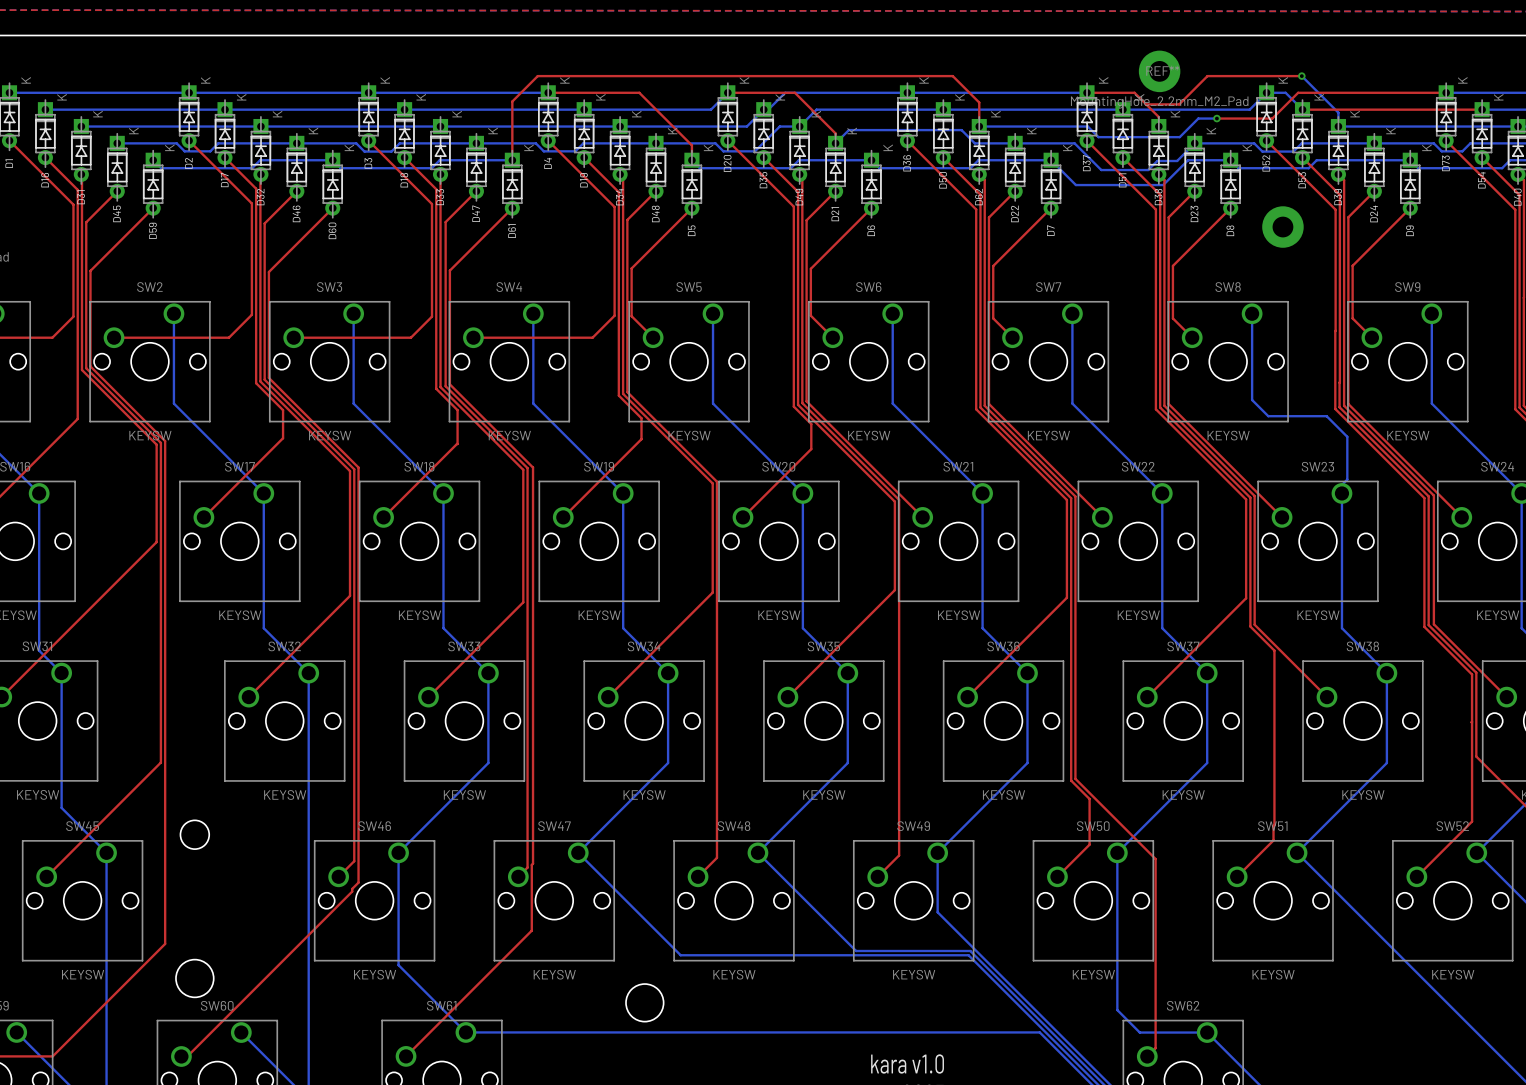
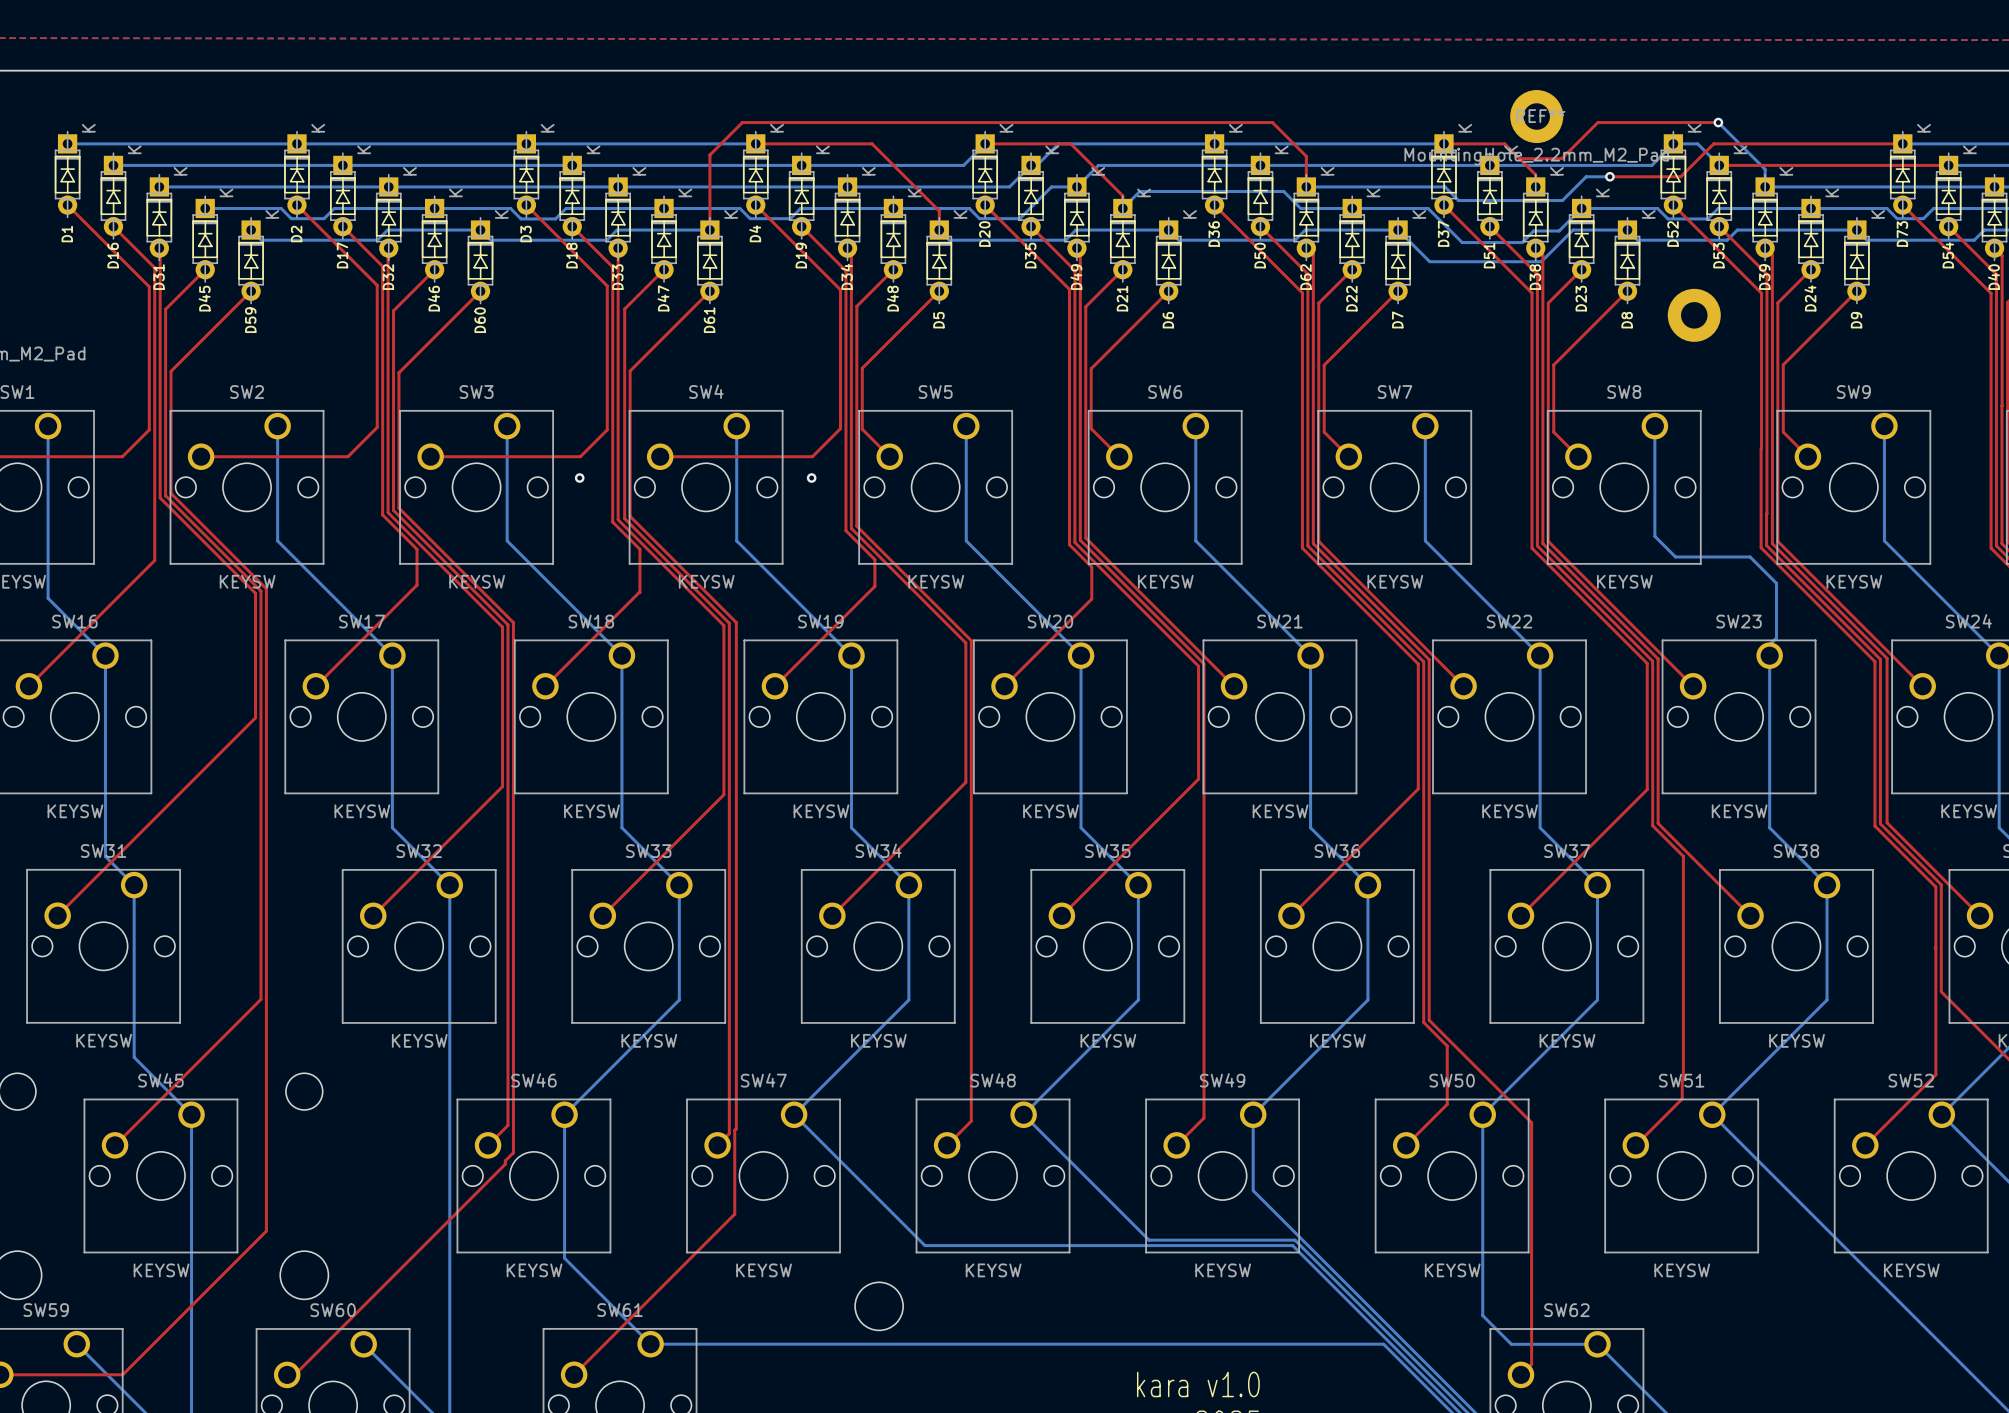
via: none -> (579, 478)
via: none -> (811, 478)

